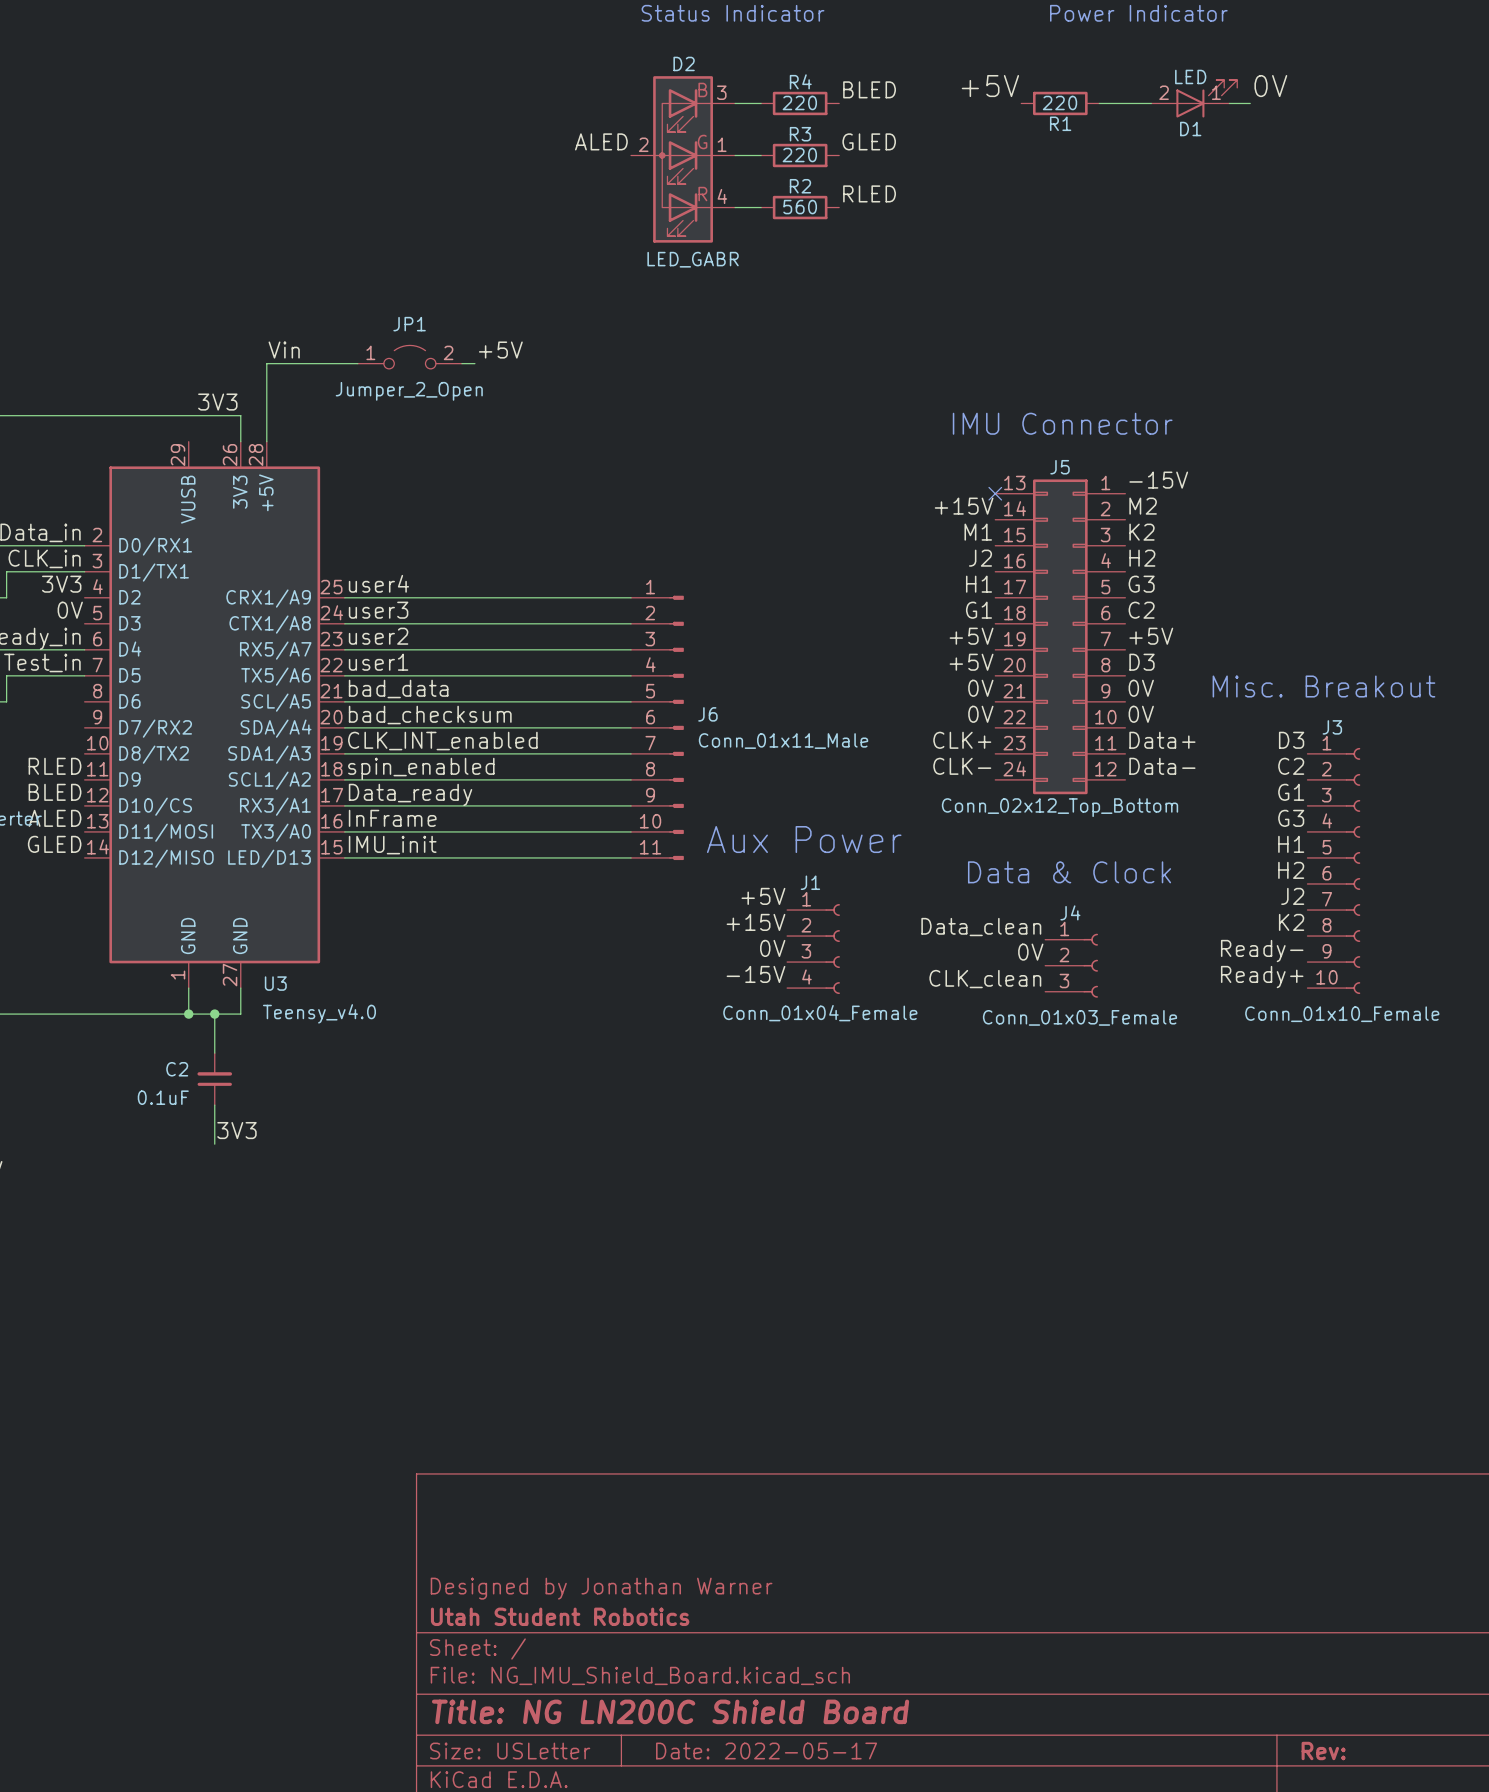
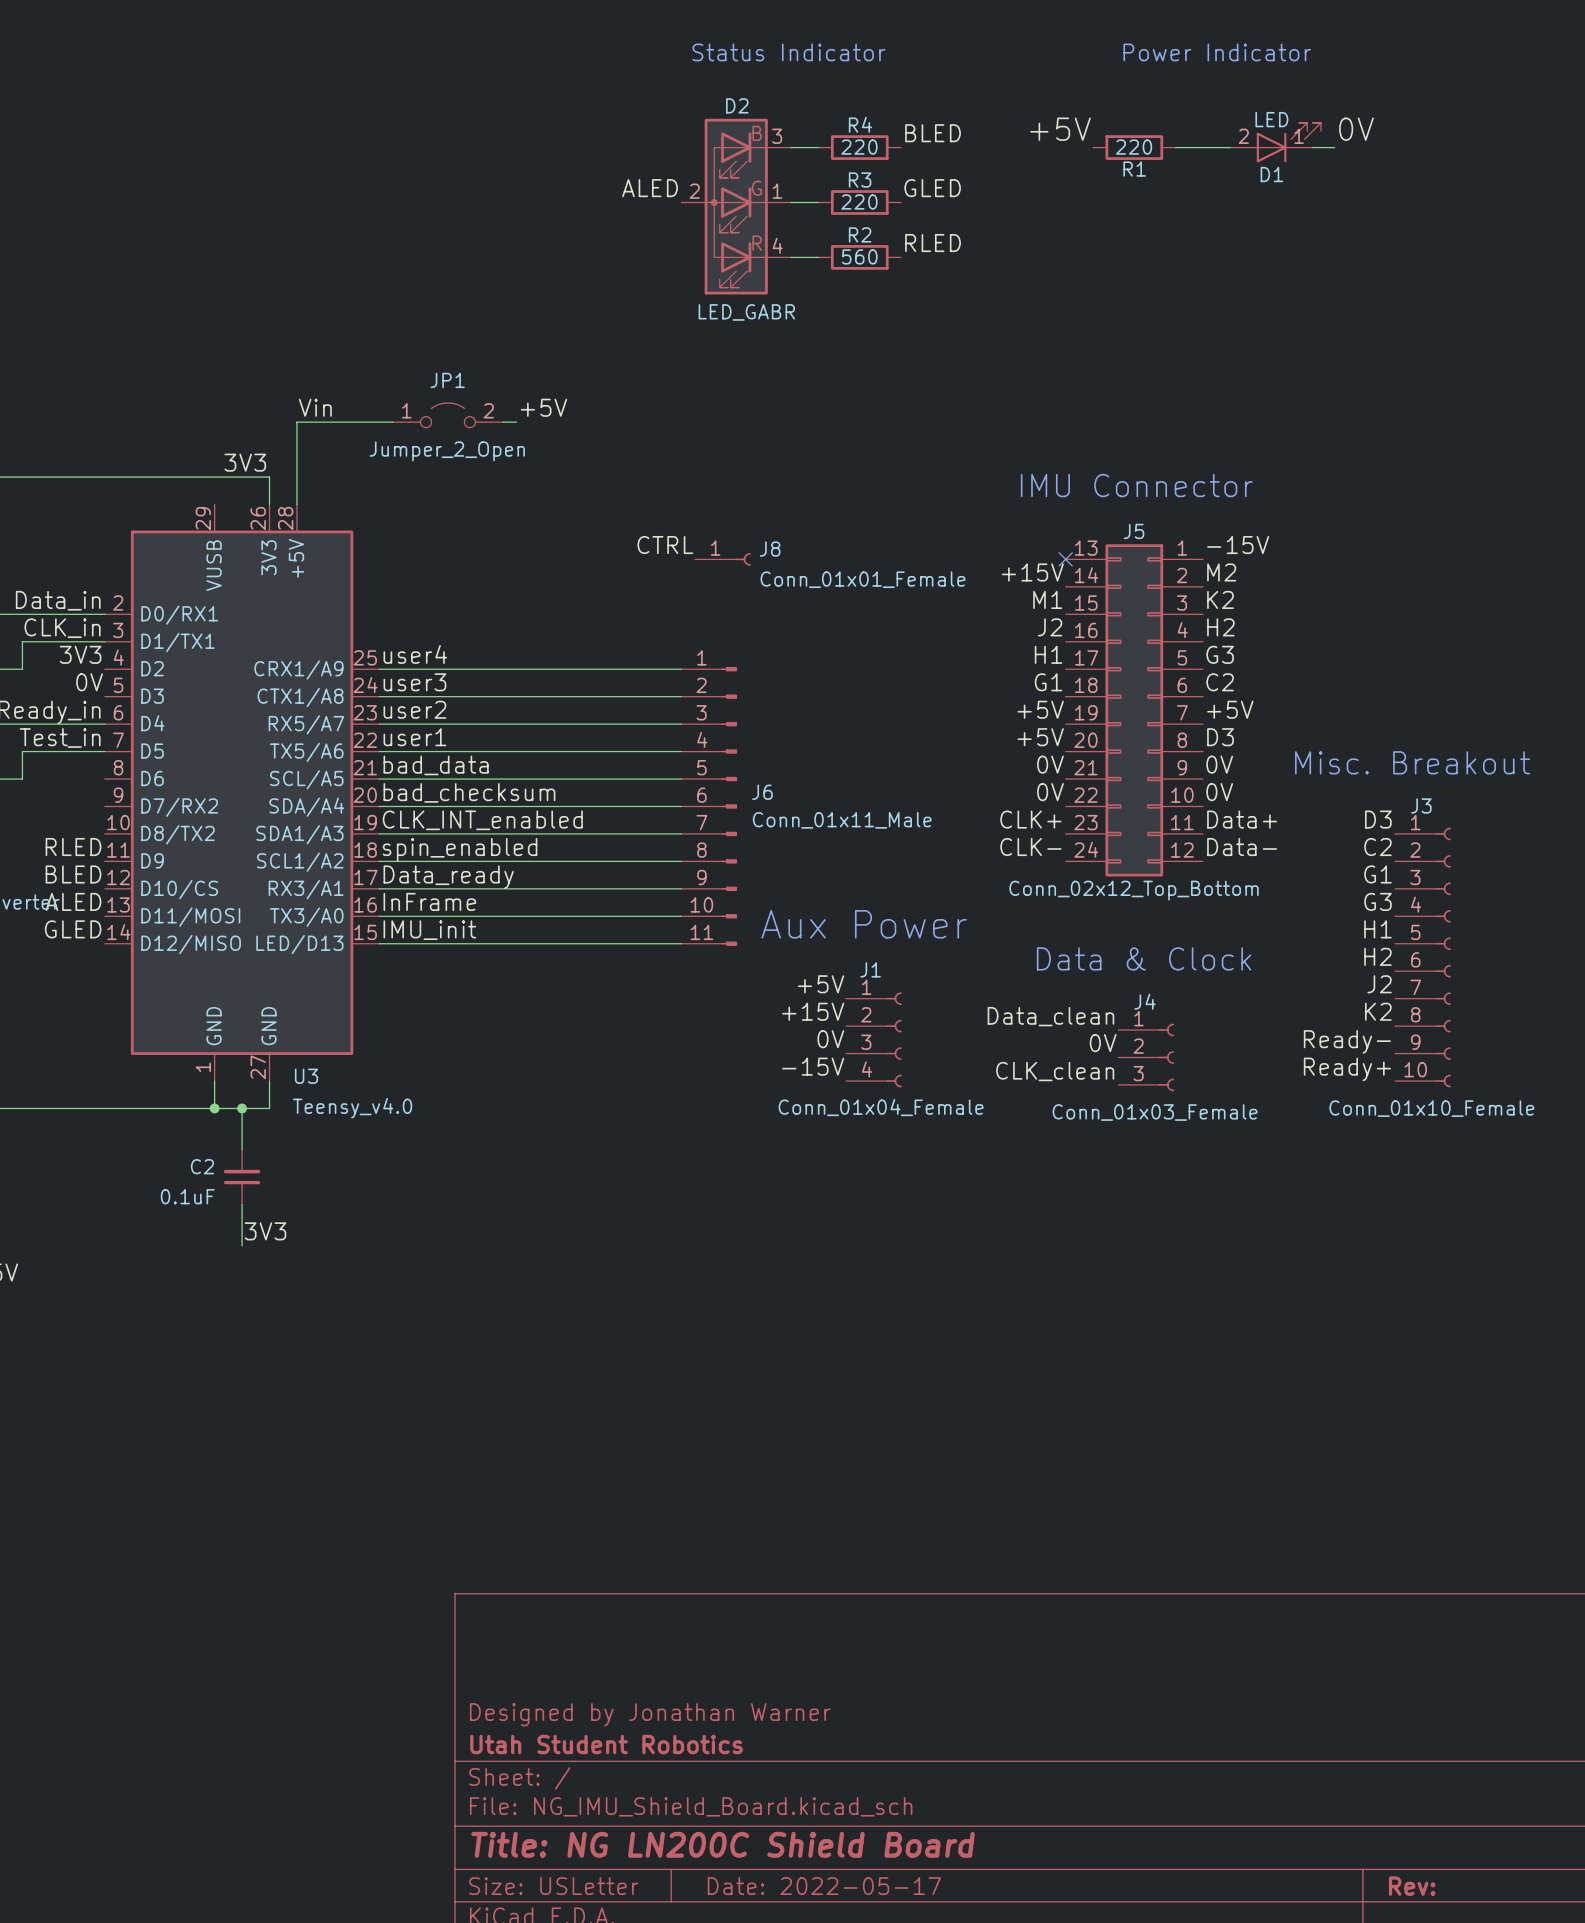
label: none -> CTRL (665, 545)
J8: none -> Conn_01x01_Female (722, 559)

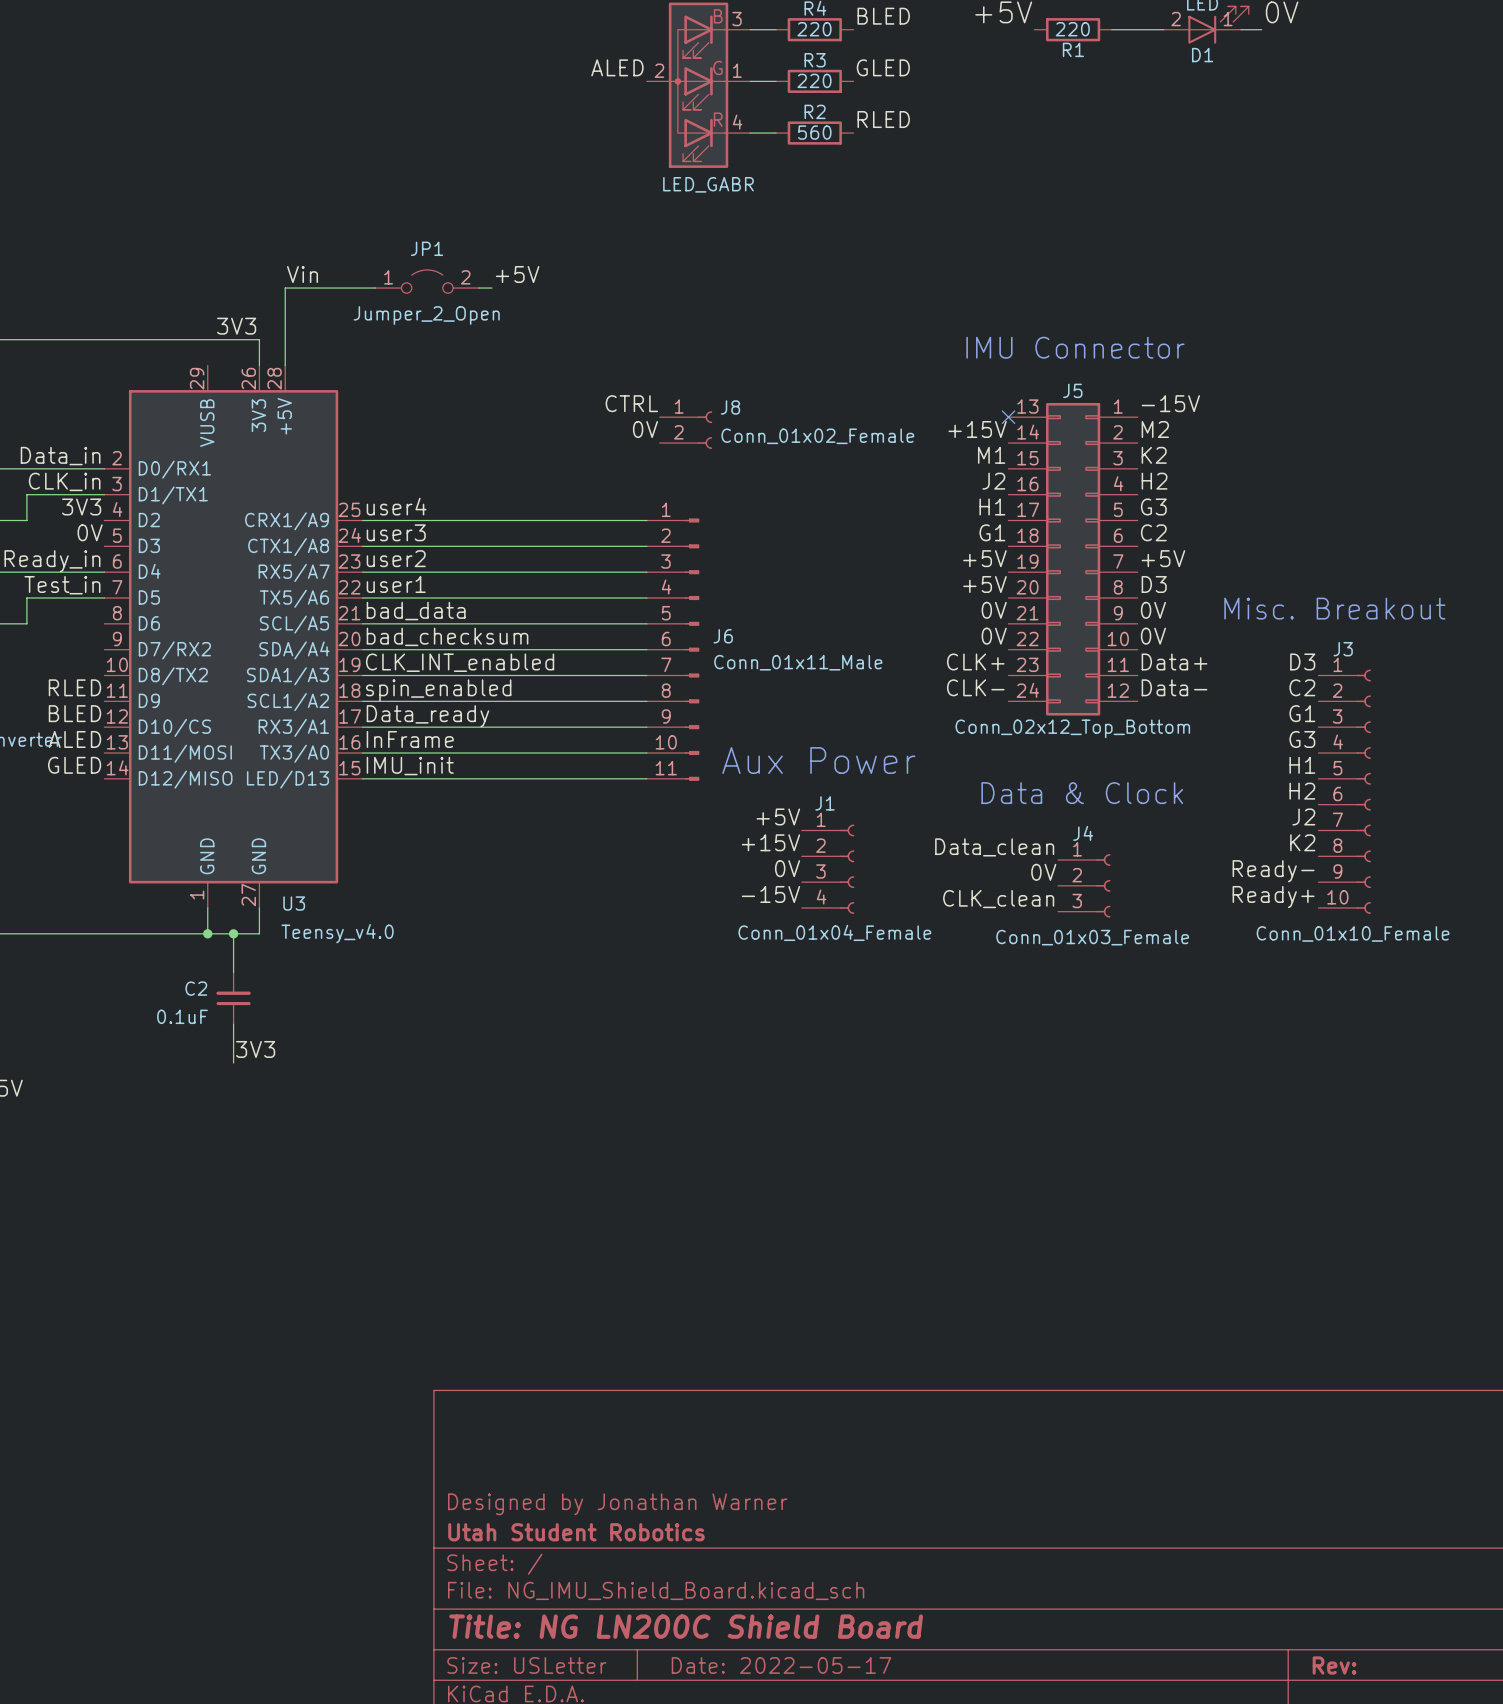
J8 symbol: [695, 553, 751, 566] -> [659, 411, 713, 449]
label: none -> 0V (645, 429)
J8 value: Conn_01x01_Female (862, 579) -> Conn_01x02_Female (817, 436)

